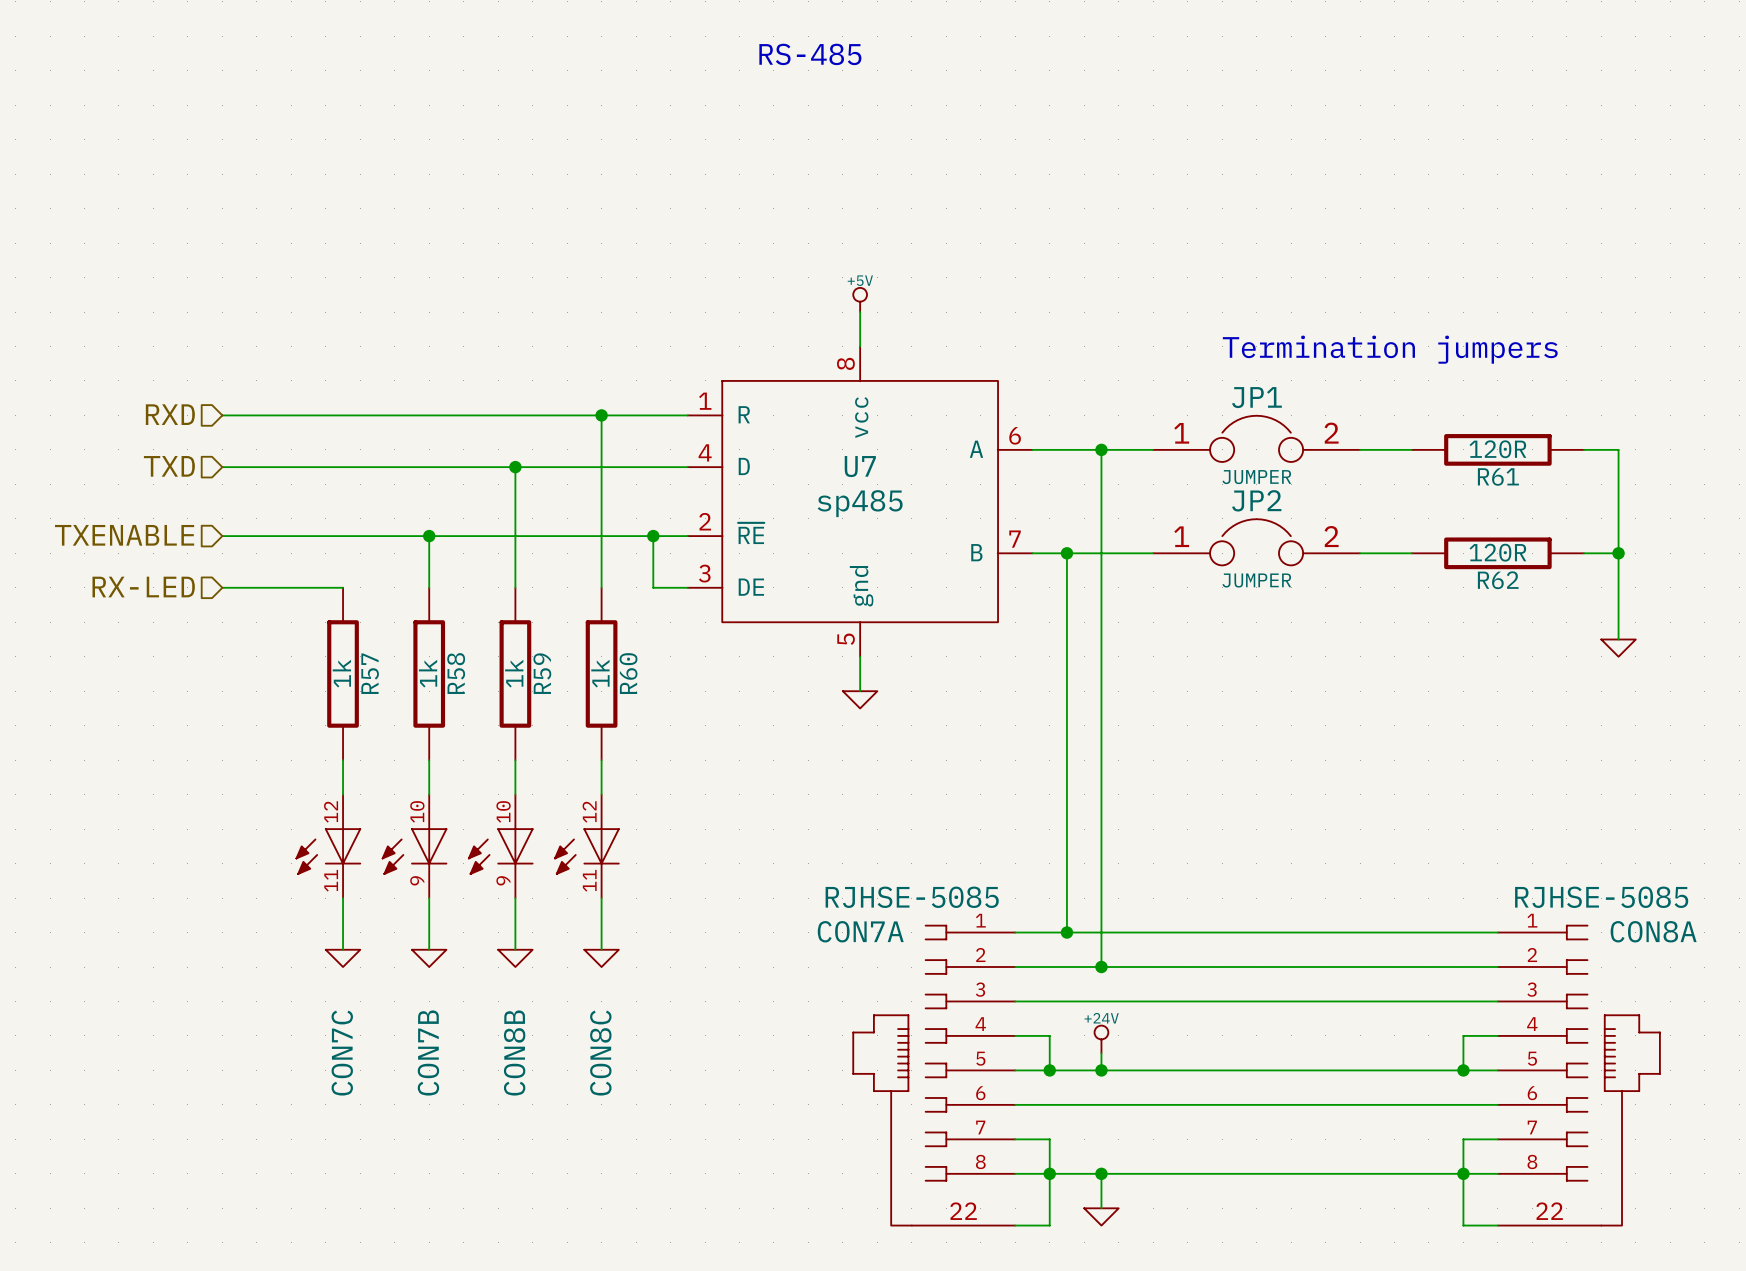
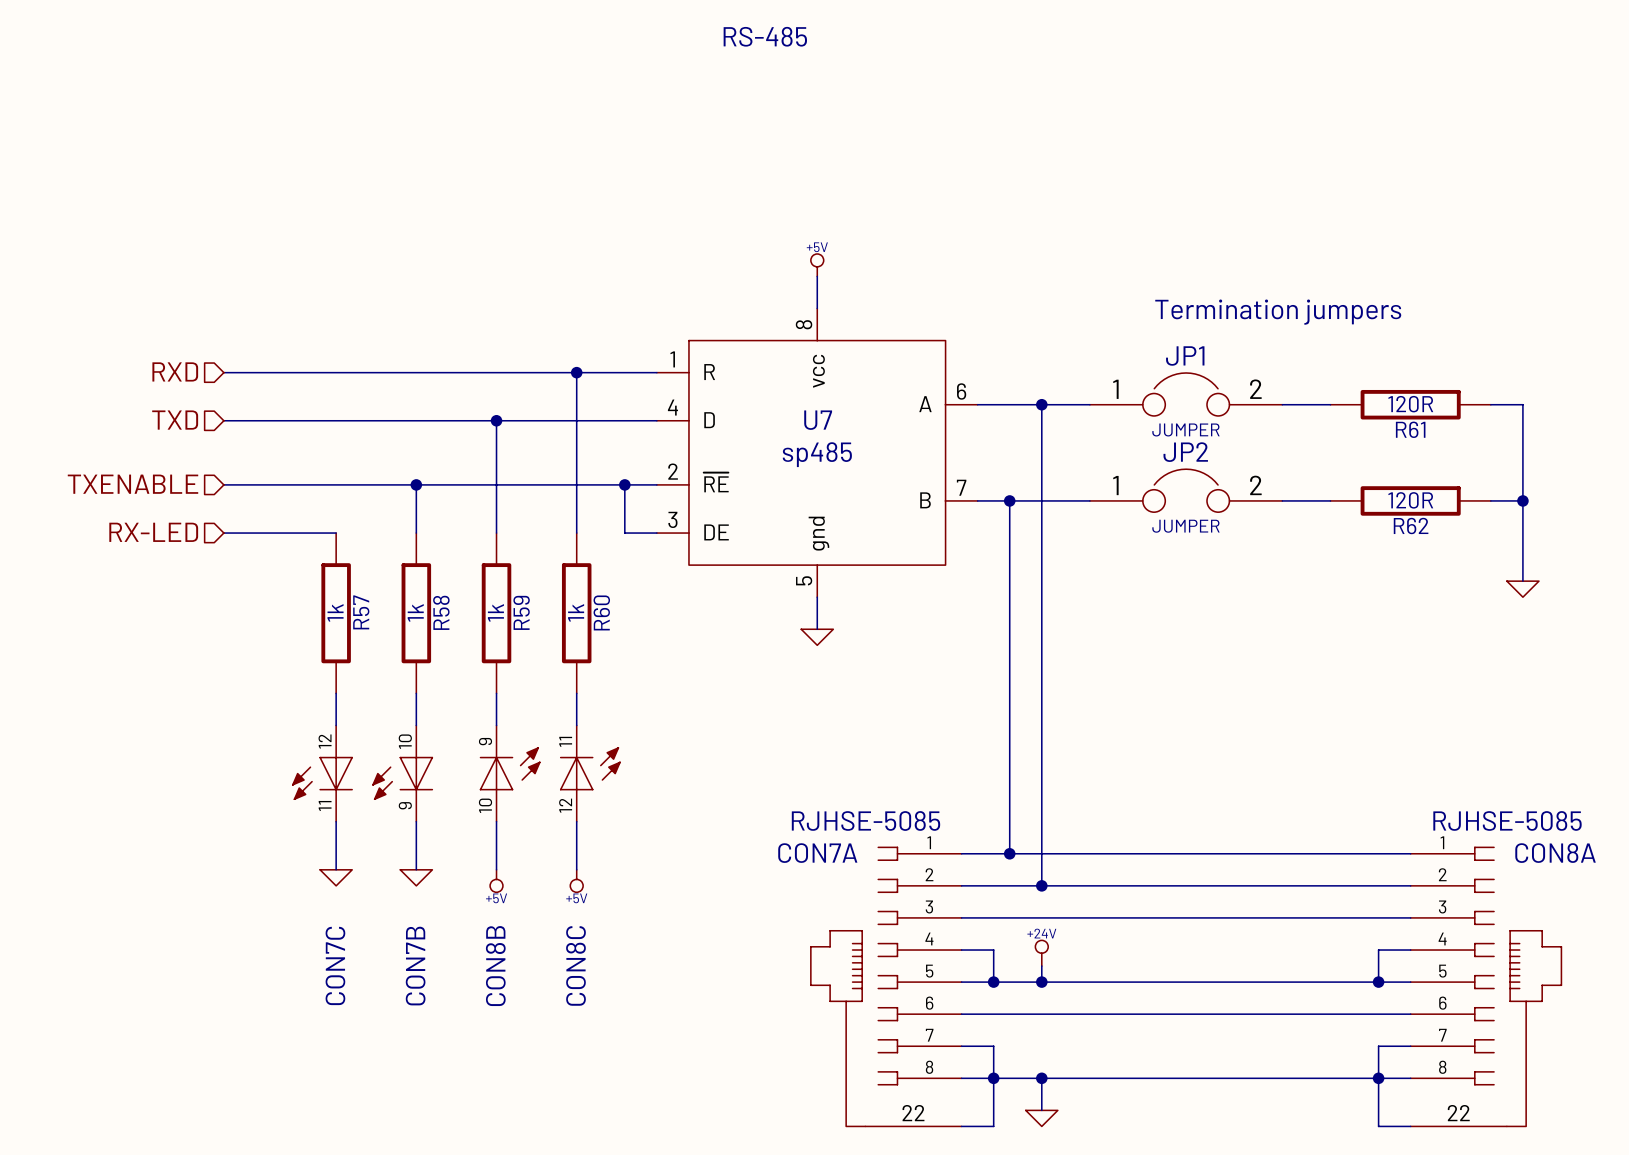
CON8B rotation: 0° (500, 851) -> 180° (510, 768)
CON8C rotation: 0° (586, 851) -> 180° (590, 768)
power symbol shape: [498, 949, 533, 968] -> [490, 869, 503, 893]
power symbol shape: [584, 949, 619, 968] -> [570, 869, 584, 893]
power symbol text: none -> +5V (496, 898)
power symbol text: none -> +5V (576, 898)

